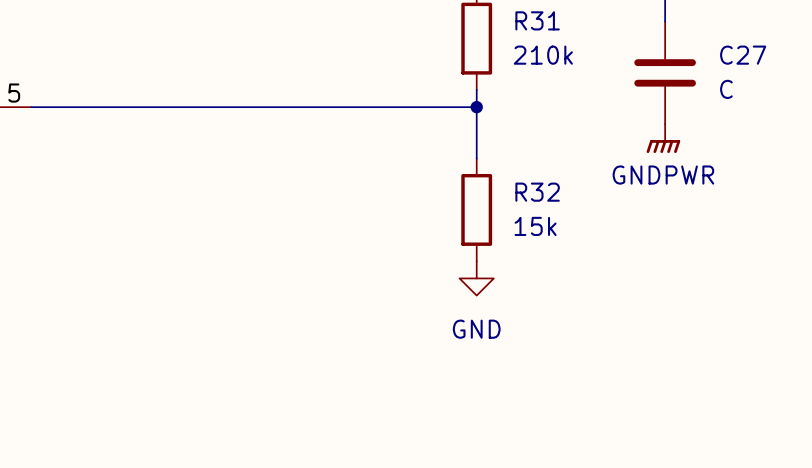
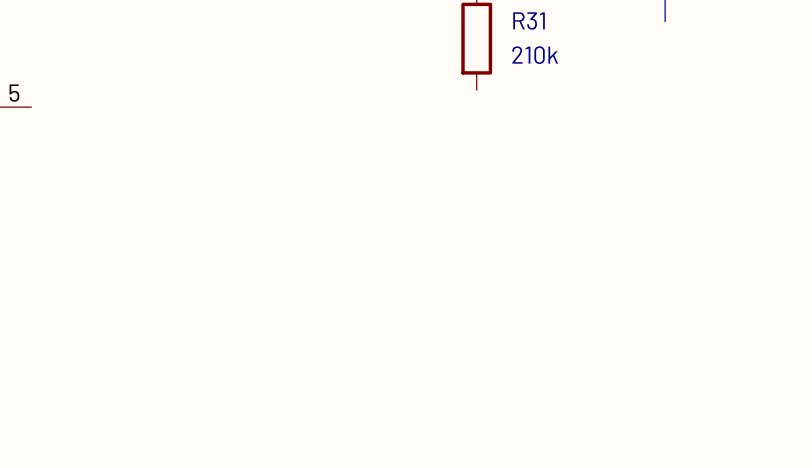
C27: C (665, 72) -> none
wire: (476, 90) (476, 158) -> none
wire: (31, 107) (476, 107) -> none
junction: (476, 107) -> none
power symbol: GNDPWR (663, 138) -> none
R32: 15k (476, 209) -> none
power symbol: GND (476, 278) -> none

